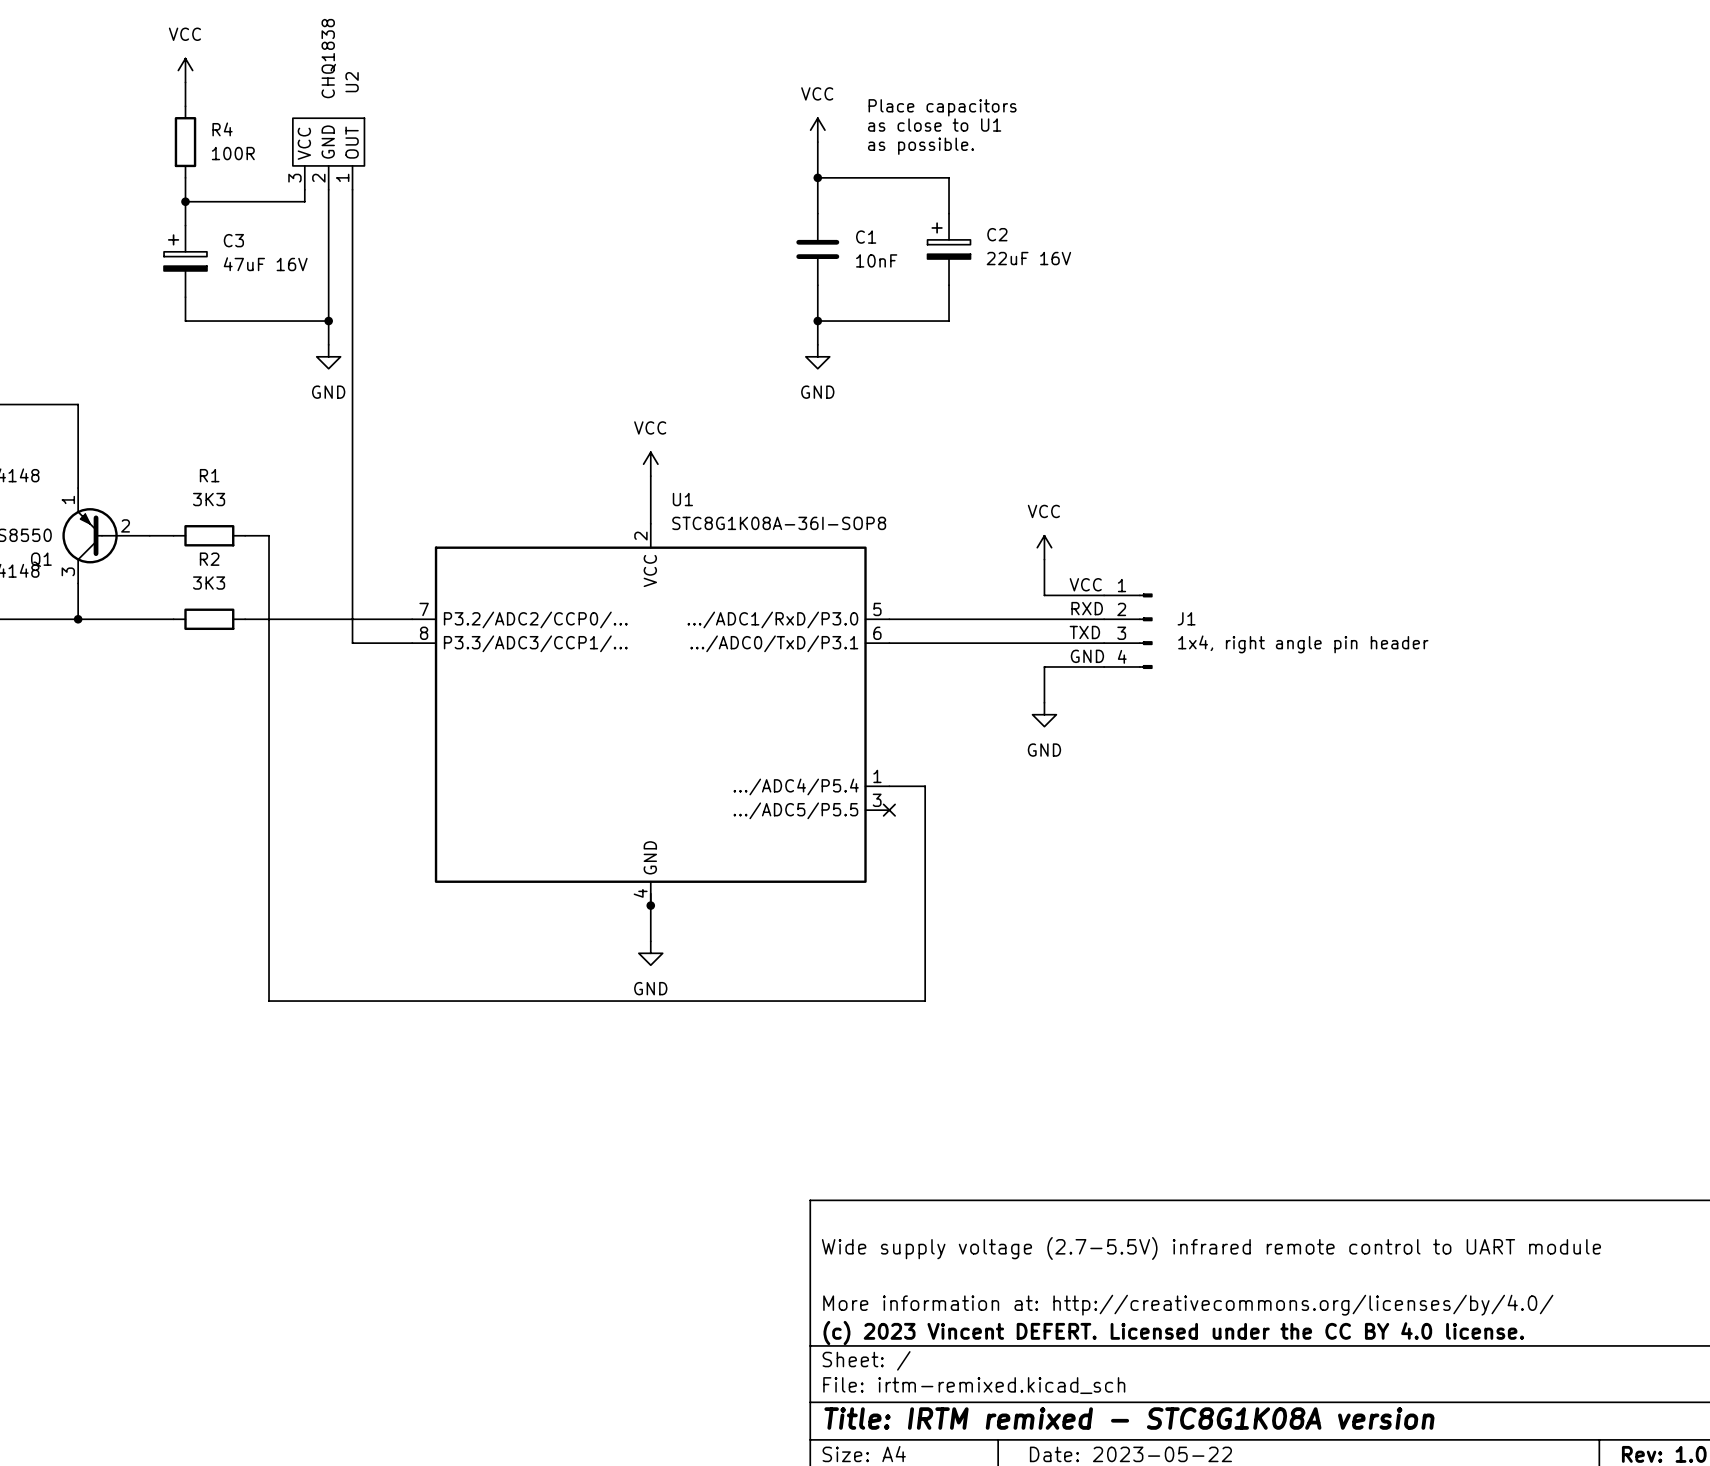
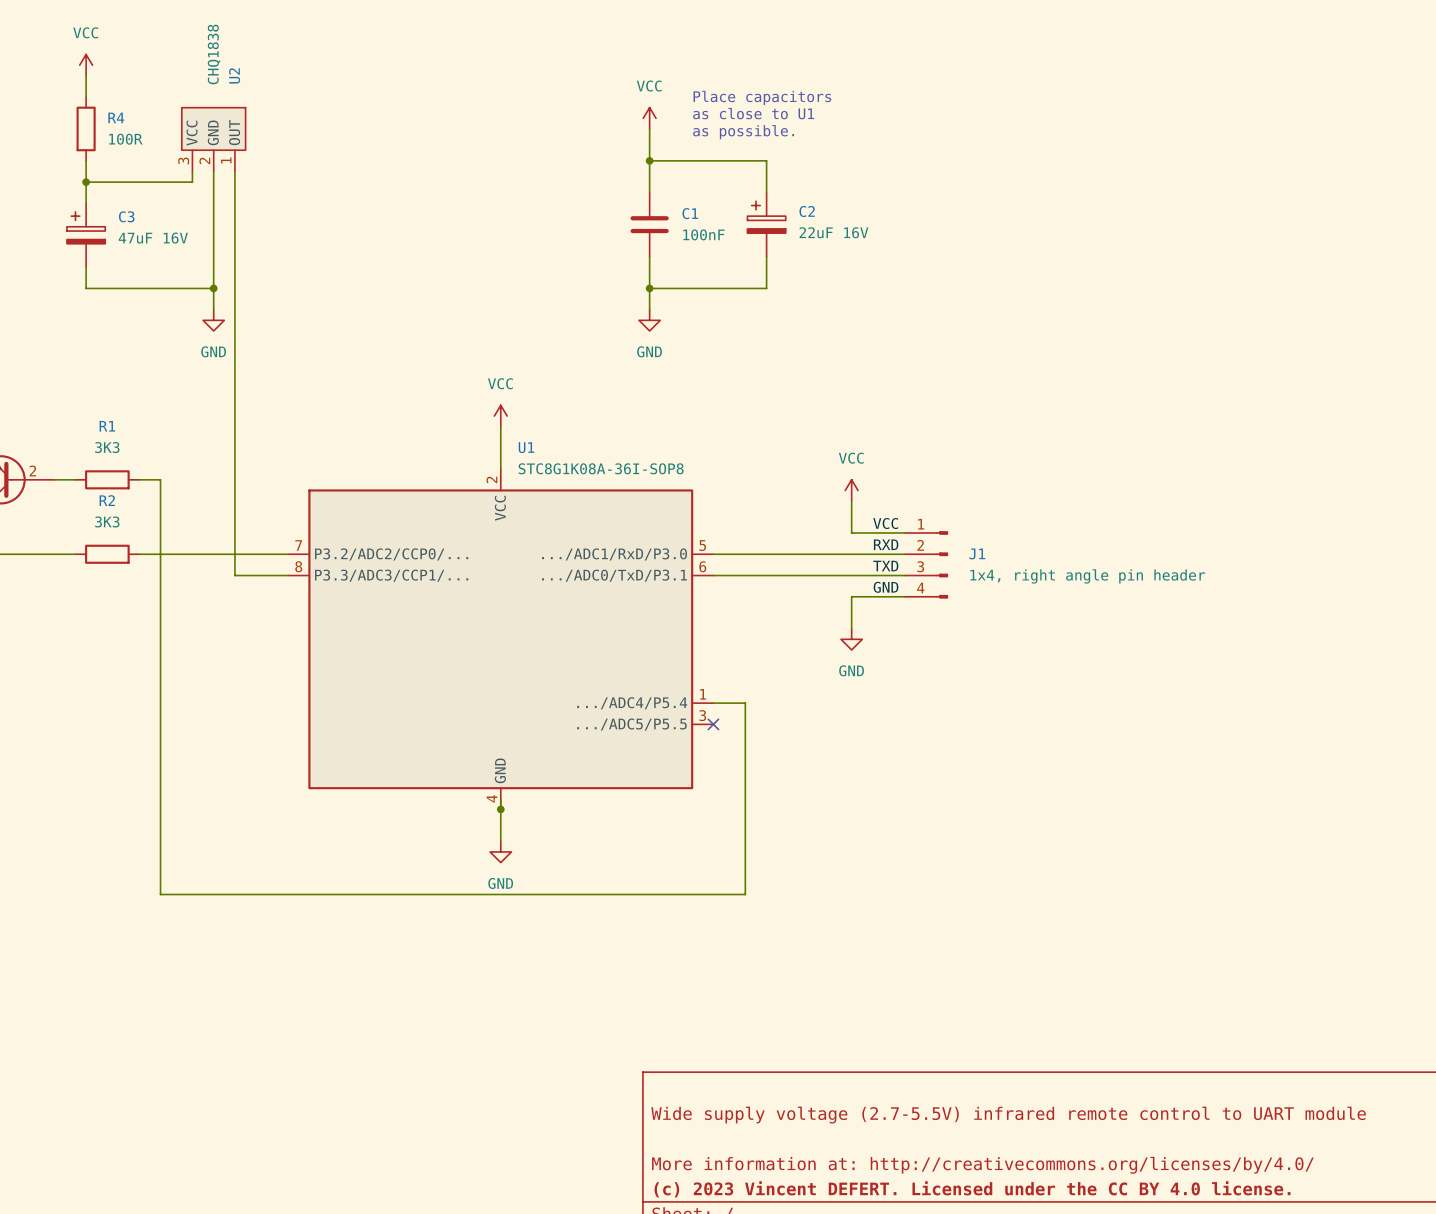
C1 value: 10nF (876, 260) -> 100nF (703, 234)

